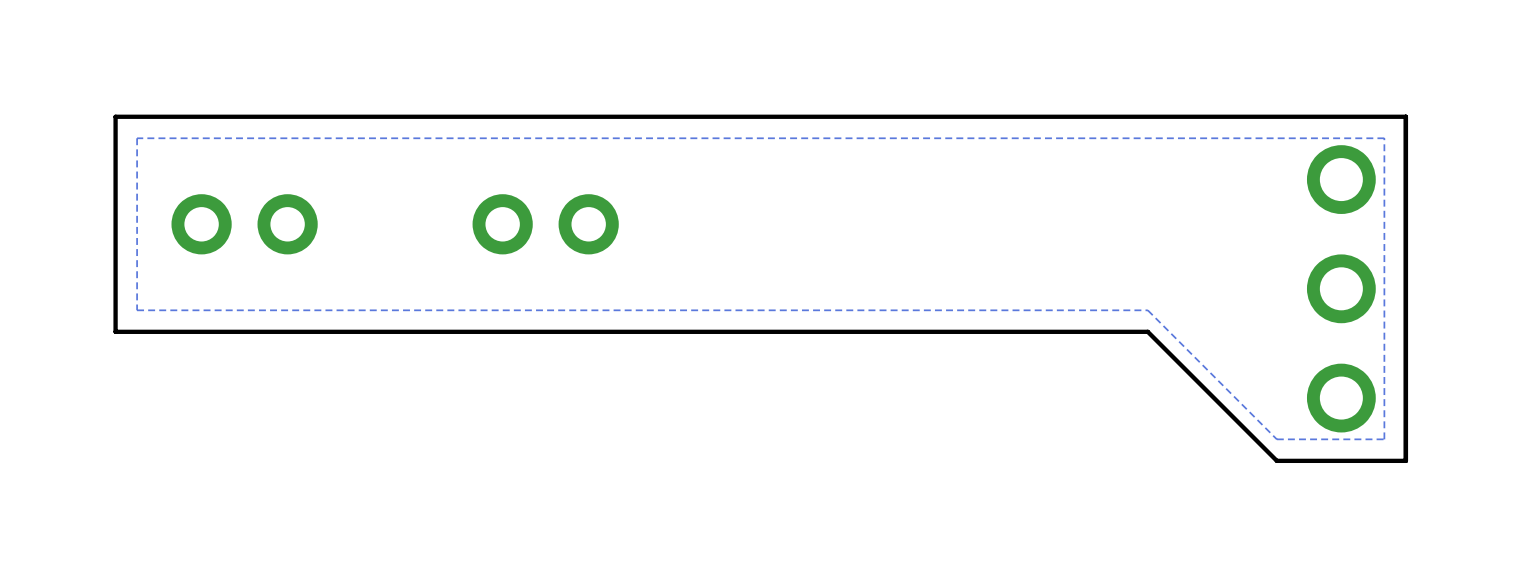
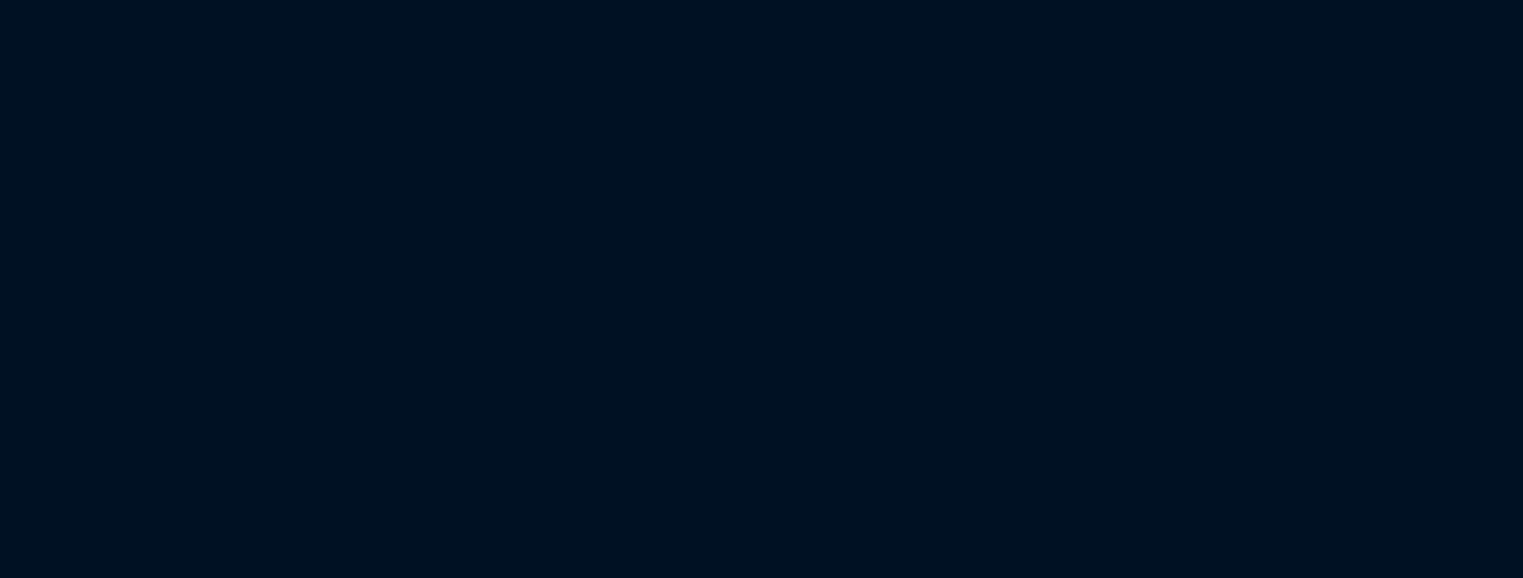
board edge: (1405, 116) (115, 116) (115, 331) (1147, 331) (1276, 460) (1405, 460) (1405, 116) -> none
zone outline: (1384, 138) (1384, 439) (1276, 439) (1147, 310) (137, 310) (137, 138) (1384, 138) -> none
part: (244, 224) -> none
part: (545, 224) -> none
part: (1341, 288) -> none

